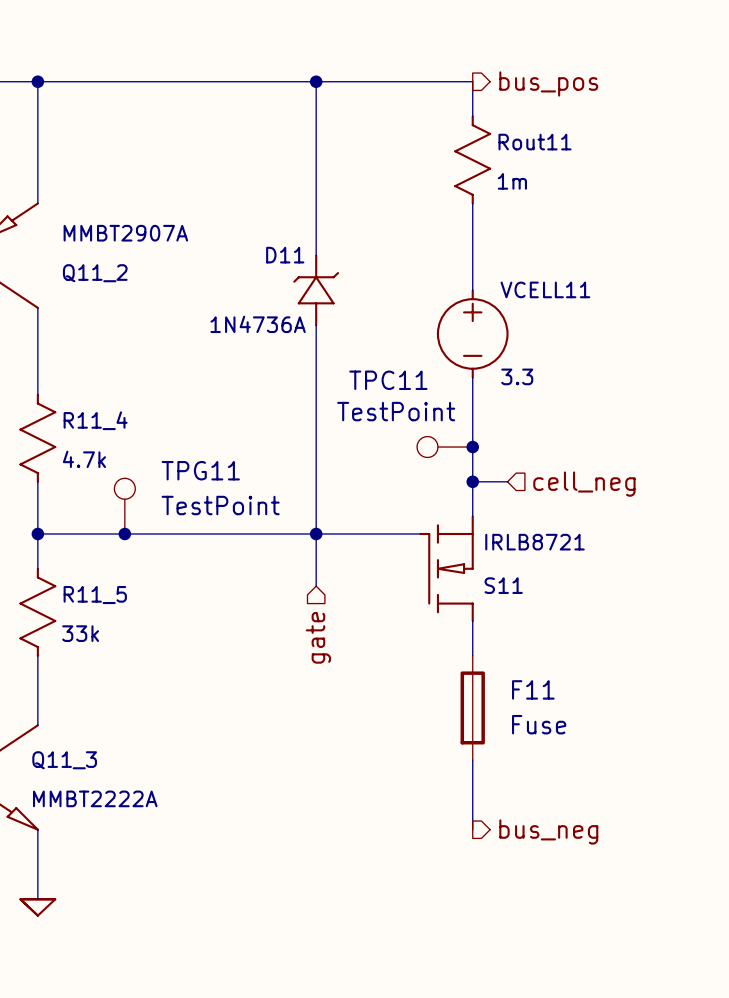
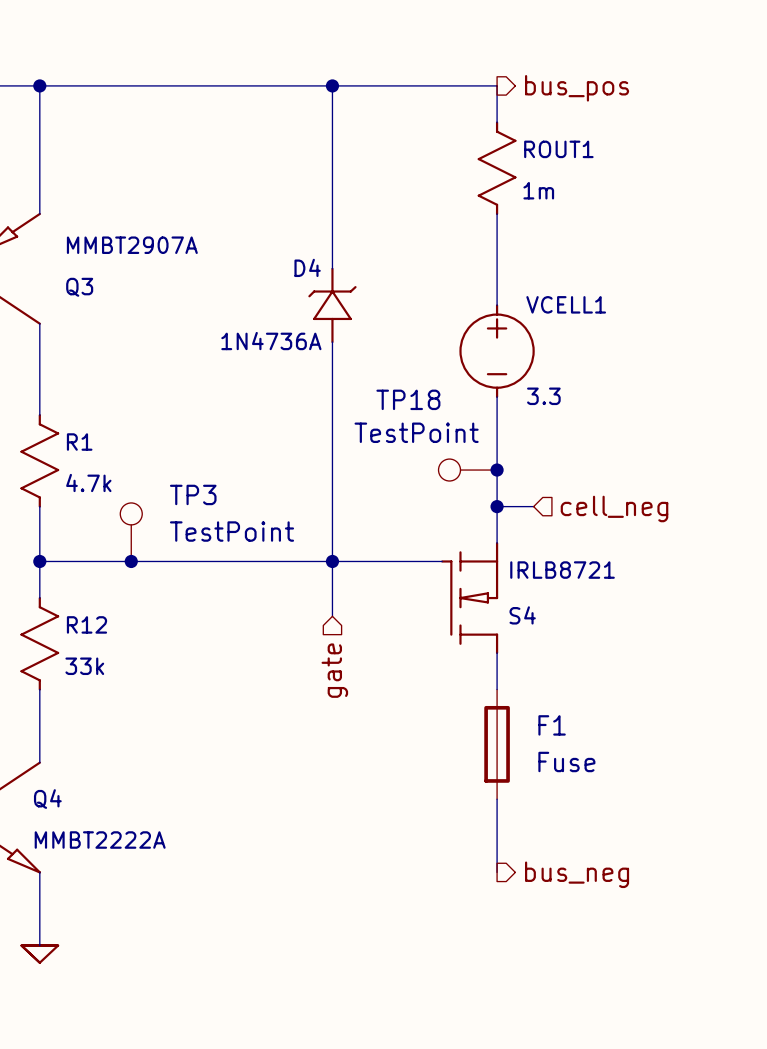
Rout11 name: Rout11 (534, 142) -> ROUT1 (558, 149)
D11 name: D11 (285, 255) -> D4 (307, 267)
Q11_2 name: Q11_2 (95, 273) -> Q3 (79, 287)
VCELL11 name: VCELL11 (545, 289) -> VCELL1 (566, 304)
TPC11 name: TPC11 (388, 380) -> TP18 (408, 399)
R11_4 name: R11_4 (95, 420) -> R1 (79, 442)
TPG11 name: TPG11 (200, 470) -> TP3 (193, 494)
S11 name: S11 (503, 585) -> S4 (522, 615)
R11_5 name: R11_5 (95, 595) -> R12 (86, 624)
F11 name: F11 (533, 689) -> F1 (552, 725)
Q11_3 name: Q11_3 (64, 760) -> Q4 (47, 799)

